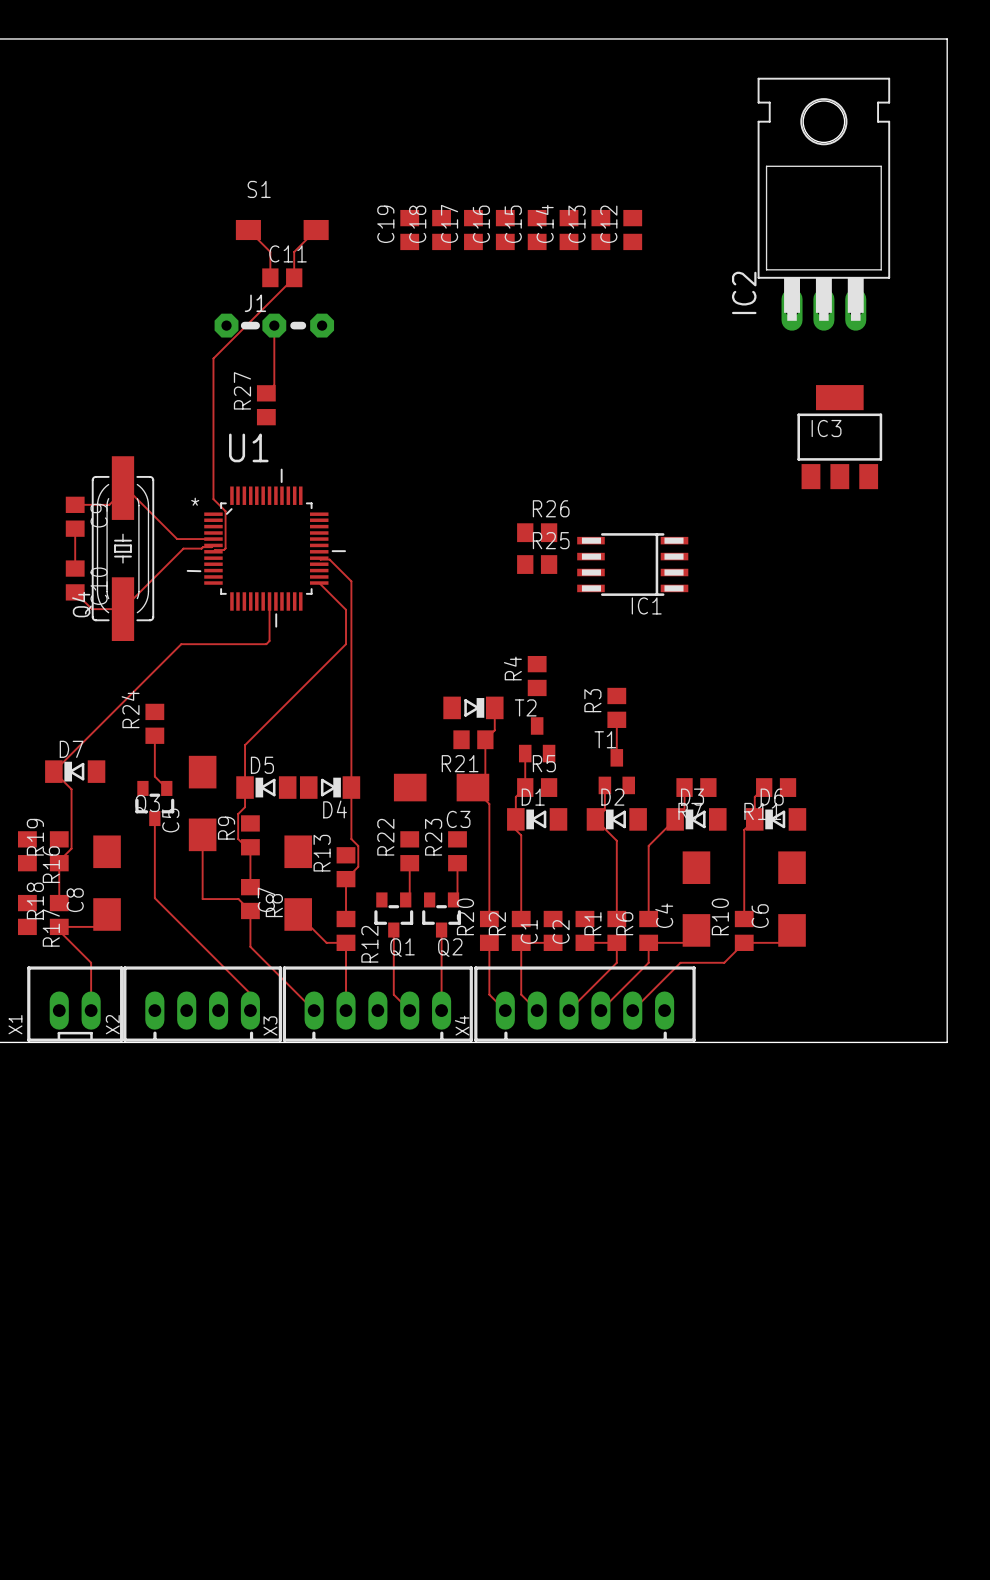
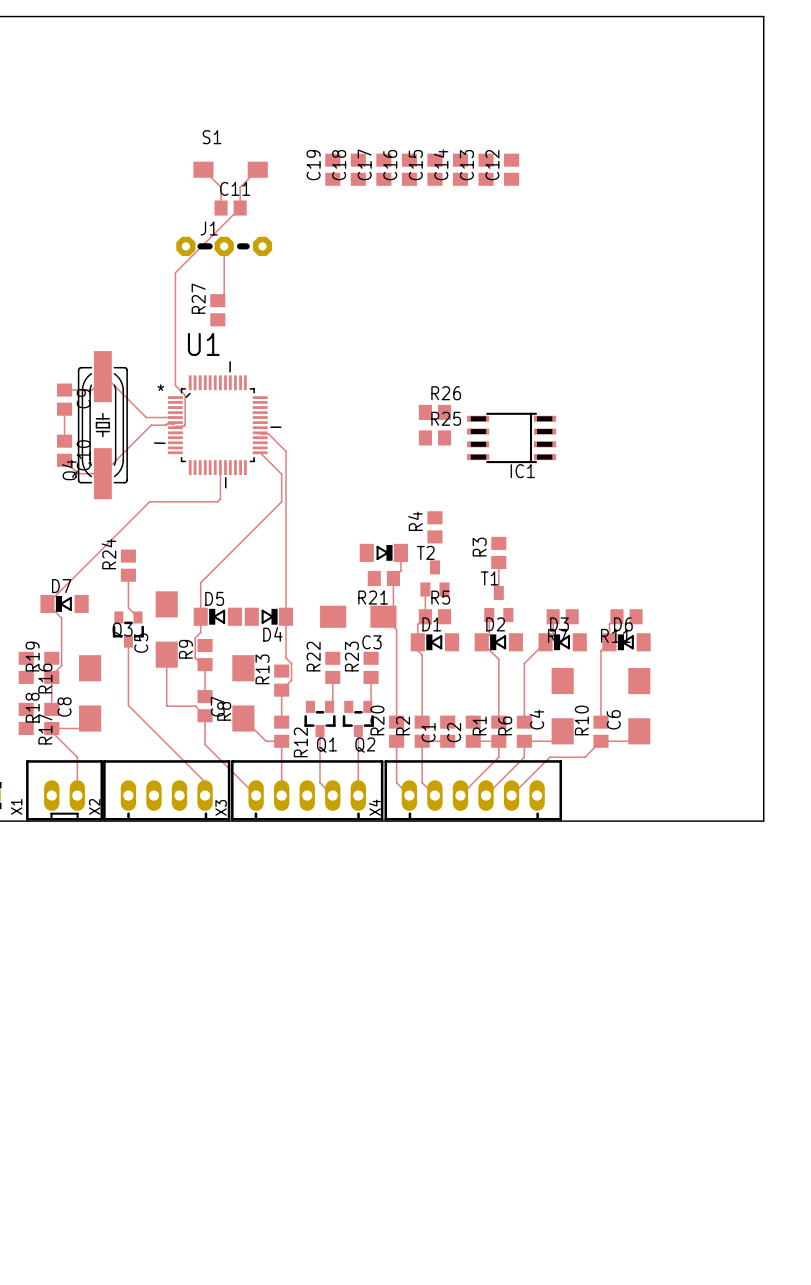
IC2: (823, 204) -> none
IC3: (839, 437) -> none

